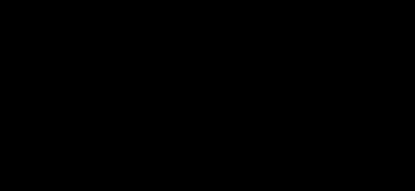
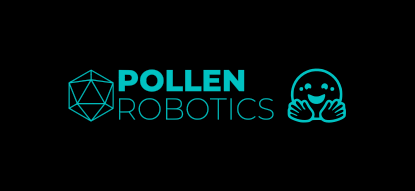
drawing: none -> [68, 68, 346, 123]

